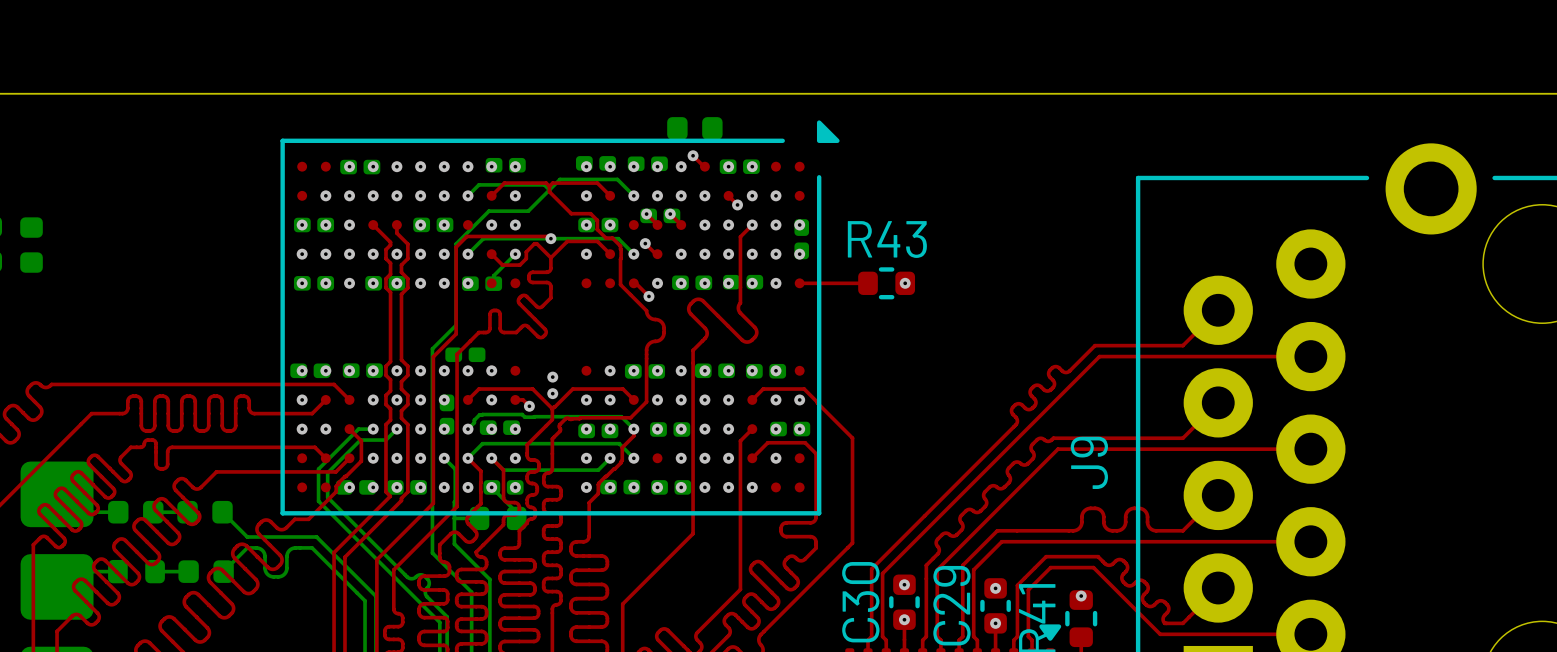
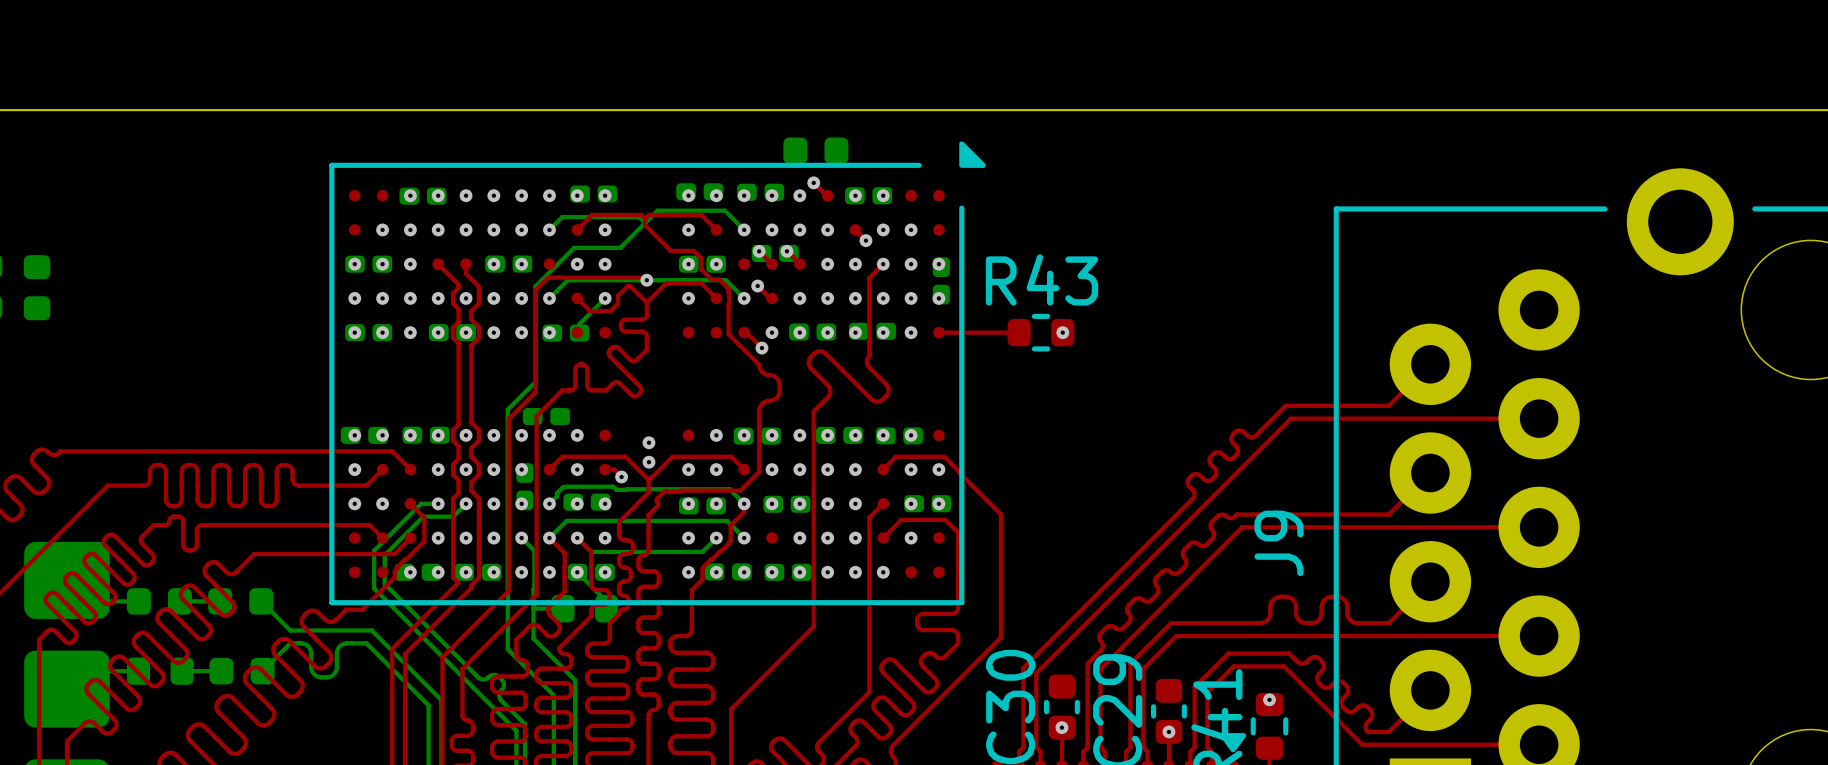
via: (904, 584) -> none
via: (995, 588) -> none

